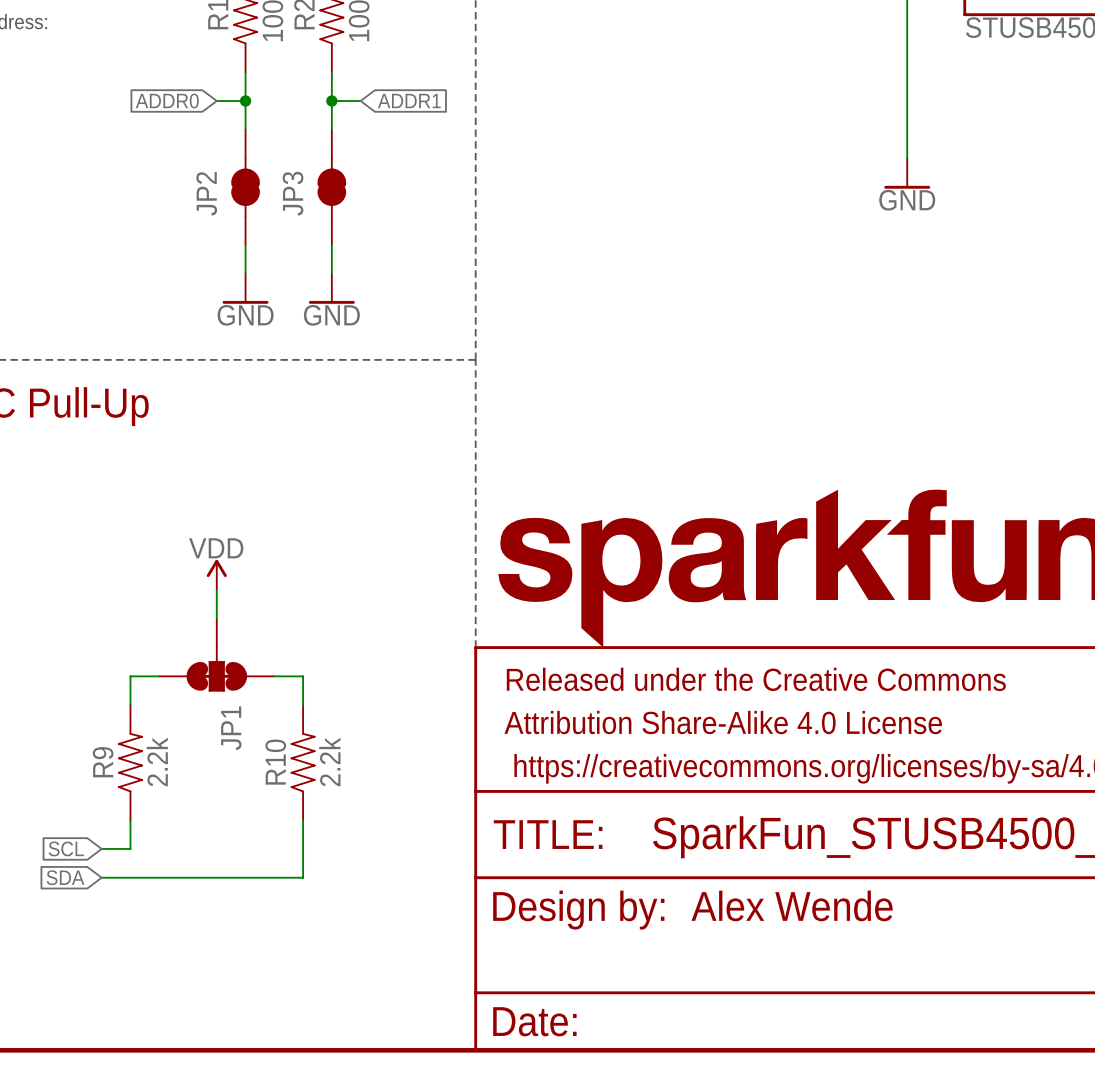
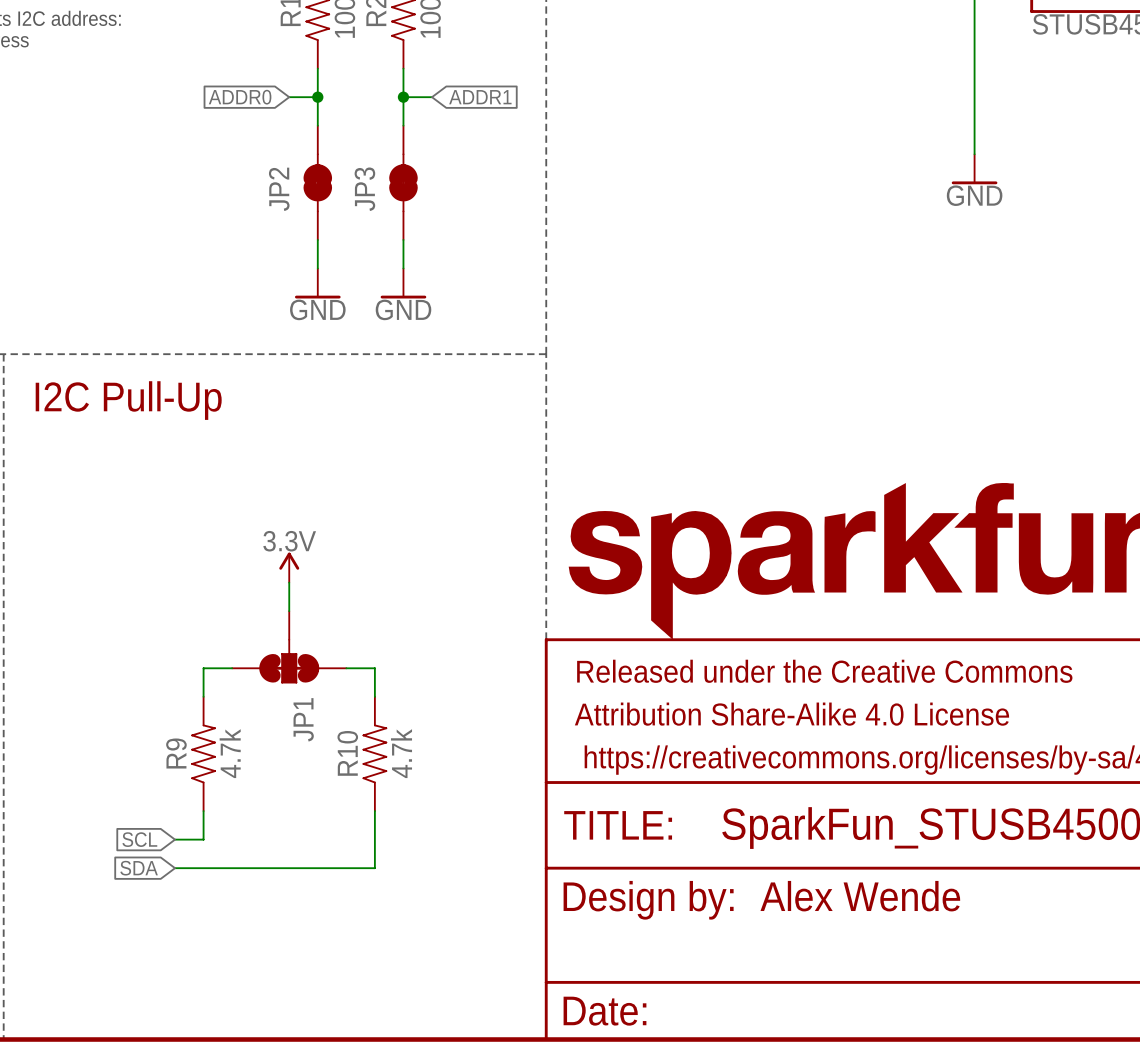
power symbol: VDD (216, 574) -> 3.3V (289, 567)
R9 value: 2.2k (157, 761) -> 4.7k (230, 753)
R10 value: 2.2k (329, 761) -> 4.7k (401, 753)

